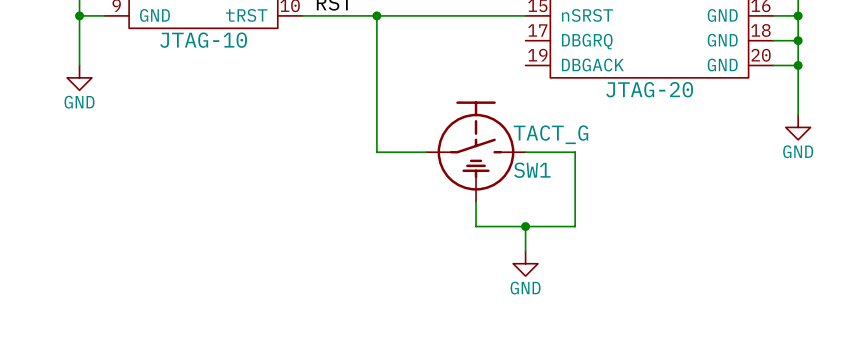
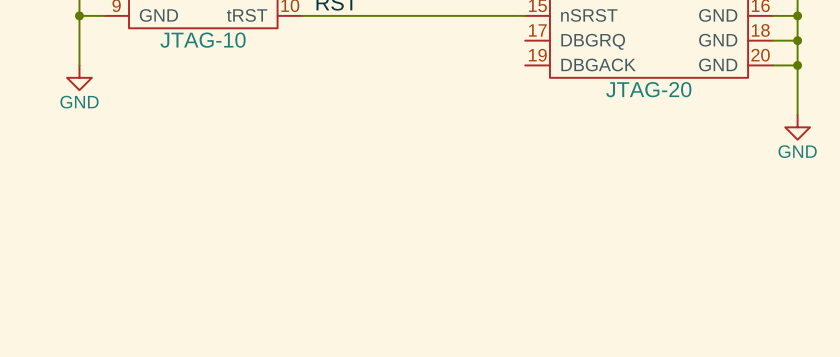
wire: (376, 15) (376, 152) (426, 152) -> none
junction: (376, 15) -> none
SW1: TACT_G (476, 151) -> none
wire: (525, 152) (575, 152) (575, 226) (476, 226) (476, 201) -> none
wire: (525, 226) (525, 251) -> none
junction: (525, 226) -> none
power symbol: GND (525, 263) -> none

